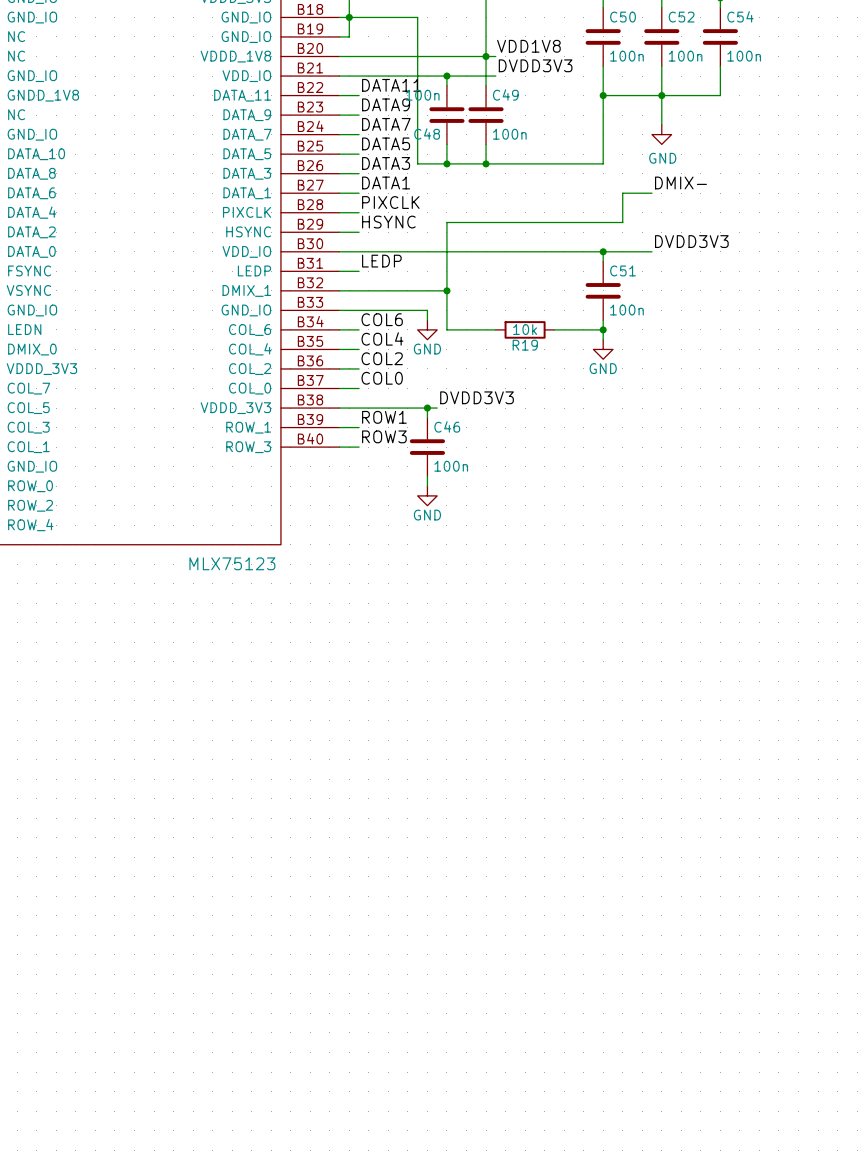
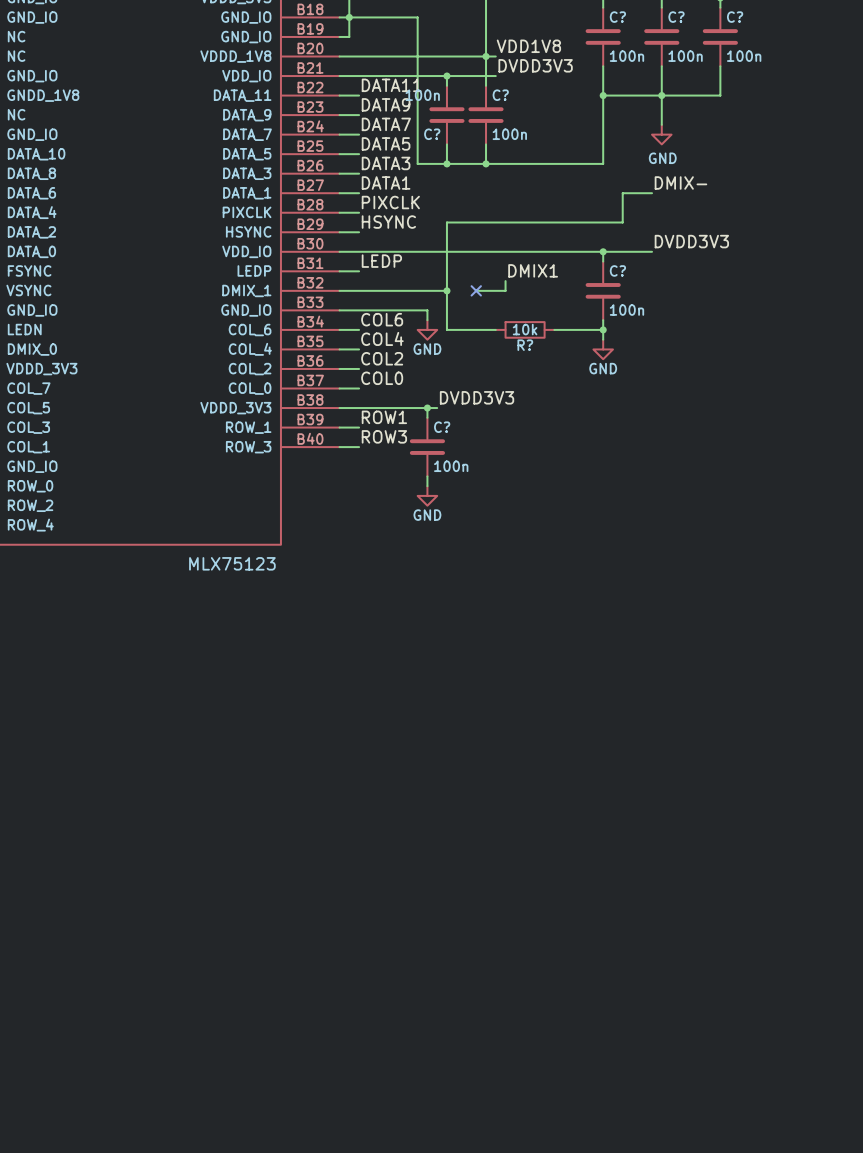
C54 name: C54 (740, 16) -> C? (735, 17)
C50 name: C50 (623, 17) -> C? (617, 17)
C52 name: C52 (681, 17) -> C? (676, 17)
C49 name: C49 (505, 94) -> C? (500, 95)
C48 name: C48 (427, 134) -> C? (432, 134)
label: none -> DMIX1 (533, 270)
C51 name: C51 (623, 270) -> C? (617, 270)
wire: none -> (505, 281) (505, 290) (476, 290)
no-connect mark: none -> (476, 290)
R19 name: R19 (525, 345) -> R? (525, 345)
C46 name: C46 (447, 426) -> C? (442, 427)

